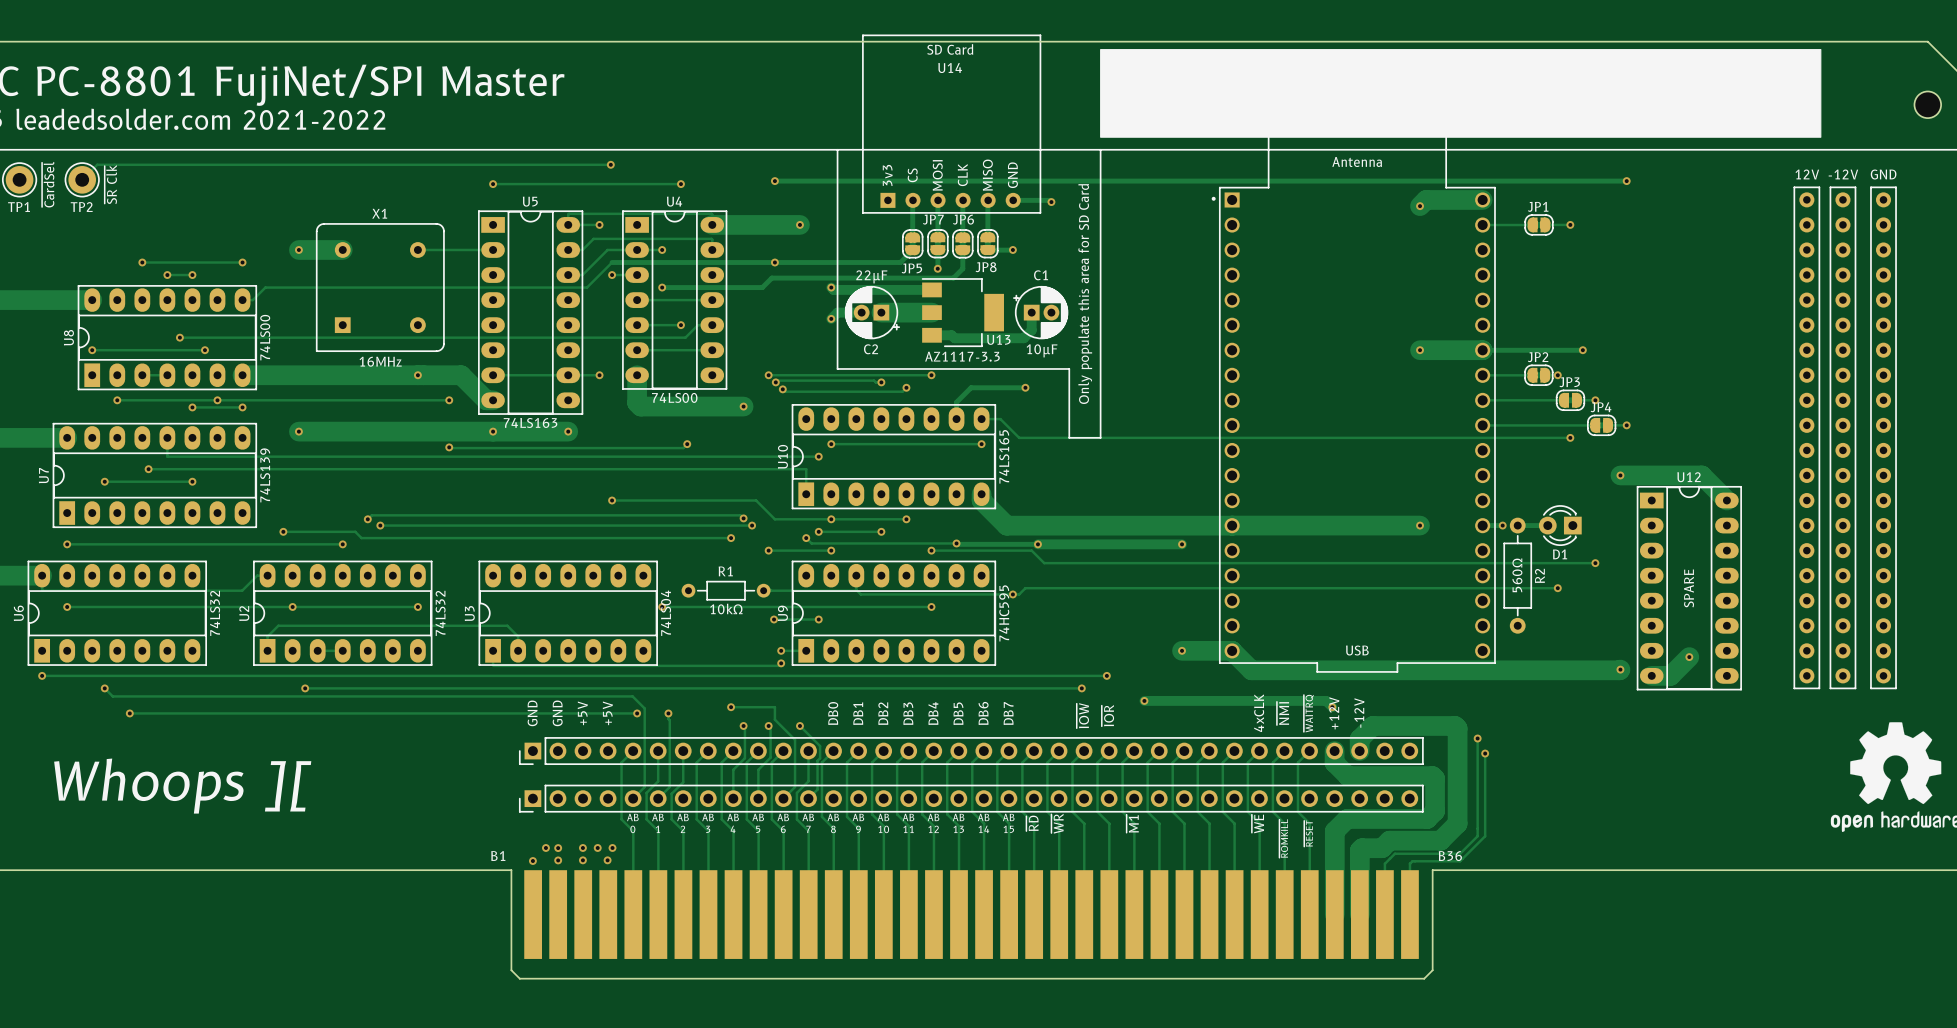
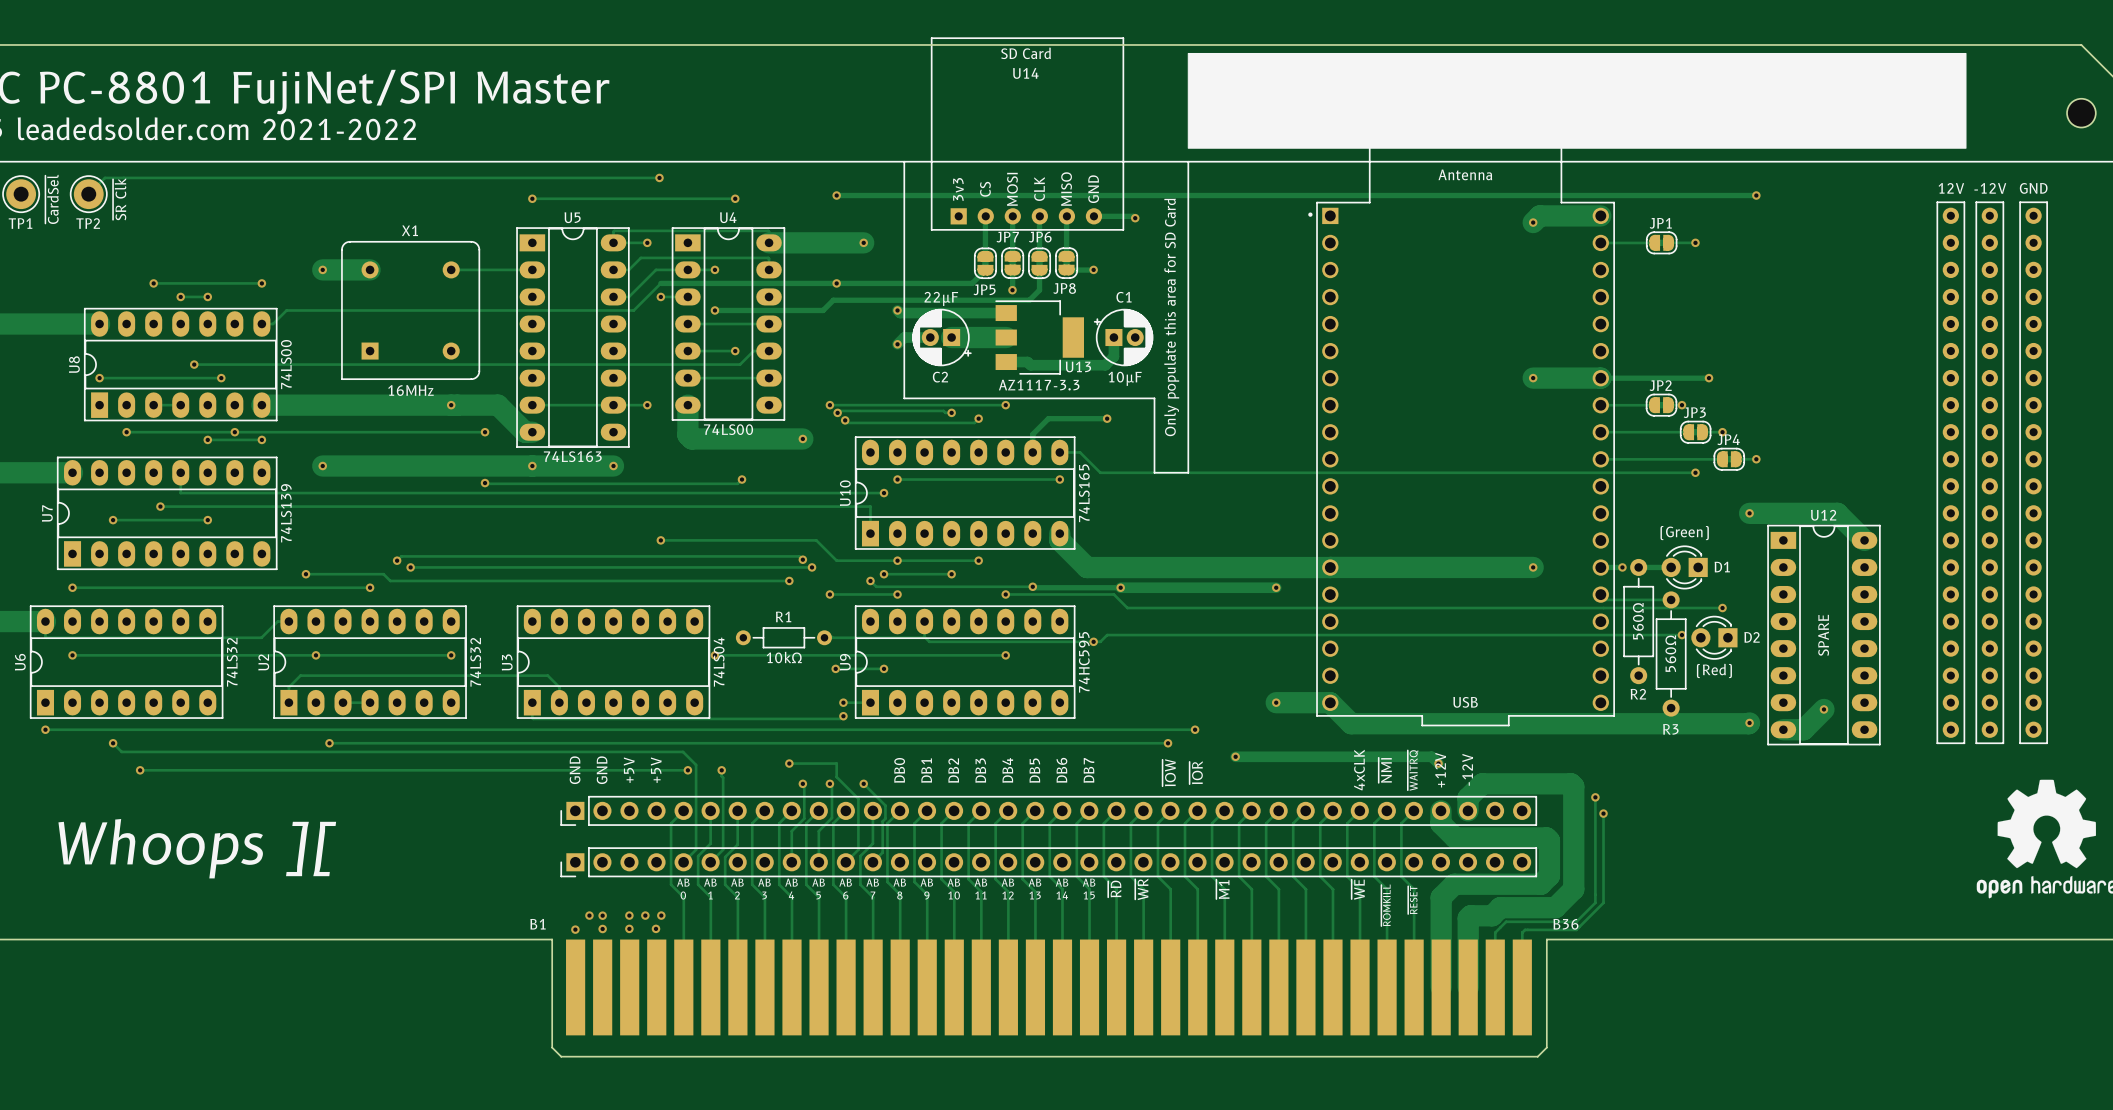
text: none -> (Green) (1684, 533)
track: none -> (1600, 594) (1606, 599) (1671, 599)
D1 name position: D1 (1560, 554) -> D1 (1722, 567)
R2 name rotation: 0° (1539, 575) -> 90° clockwise (1638, 694)
R2 name position: R2 (1539, 575) -> R2 (1638, 694)
D2: none -> (1714, 637)
R3: none -> 560Ω (1671, 654)
text: none -> (Red) (1714, 670)

